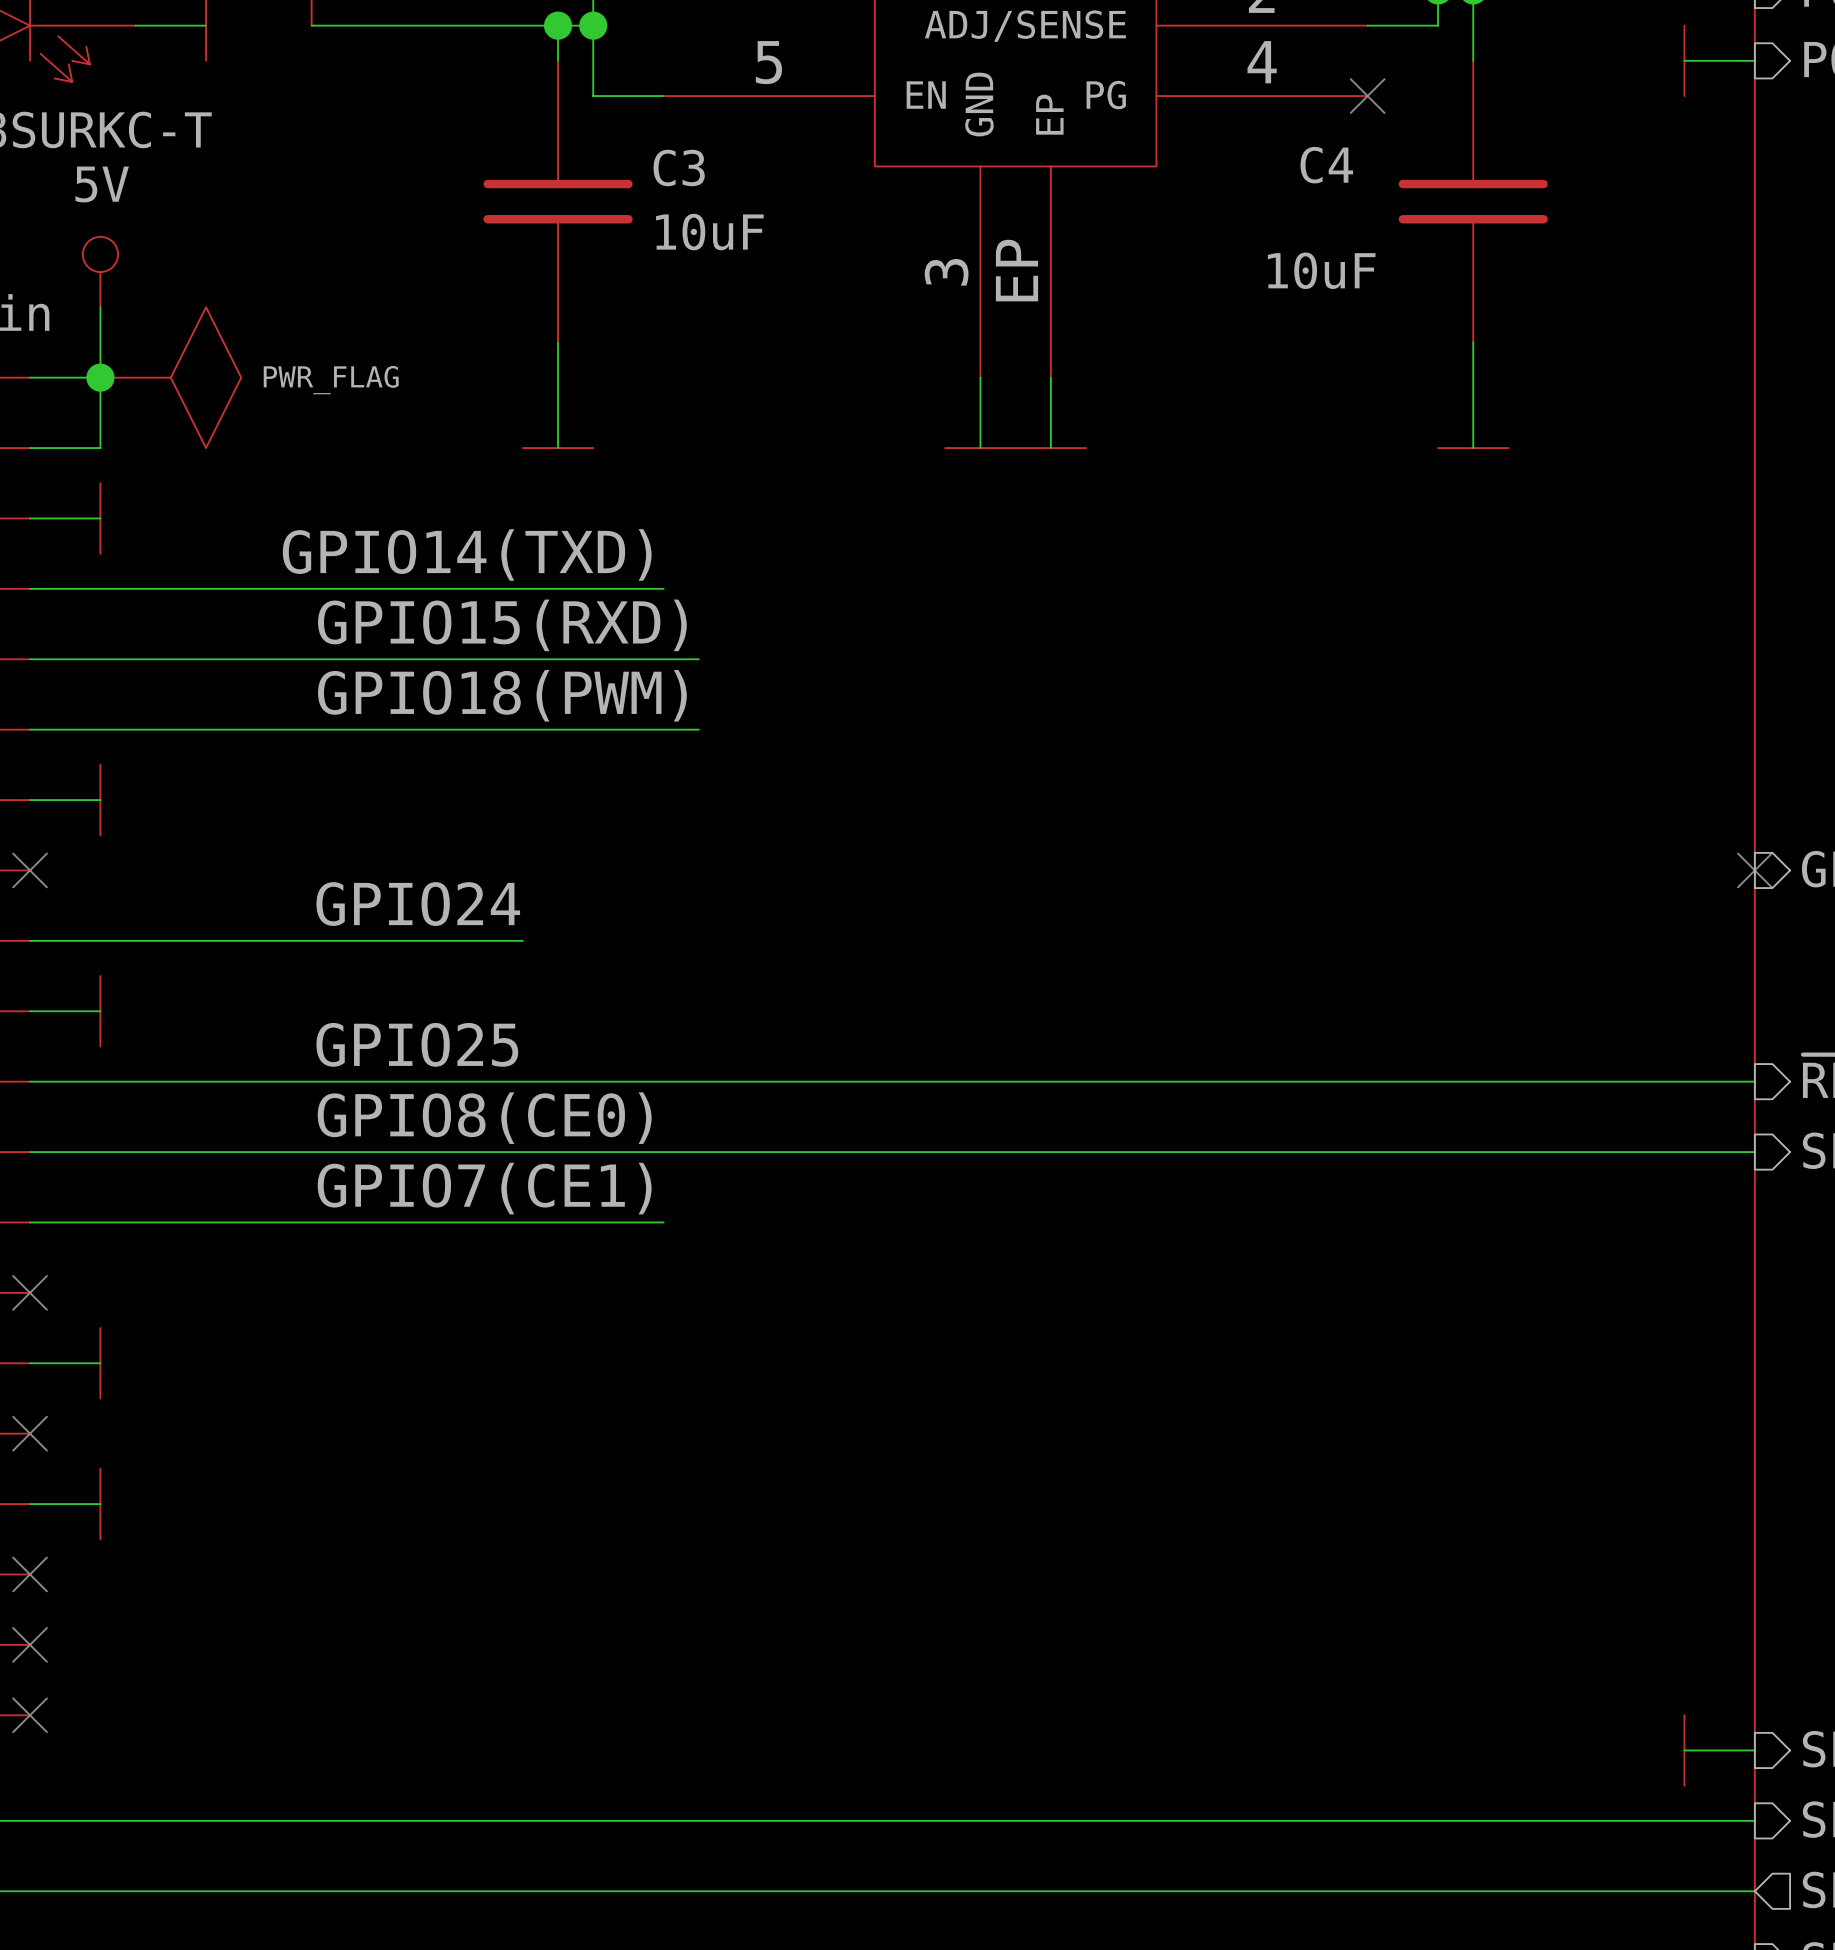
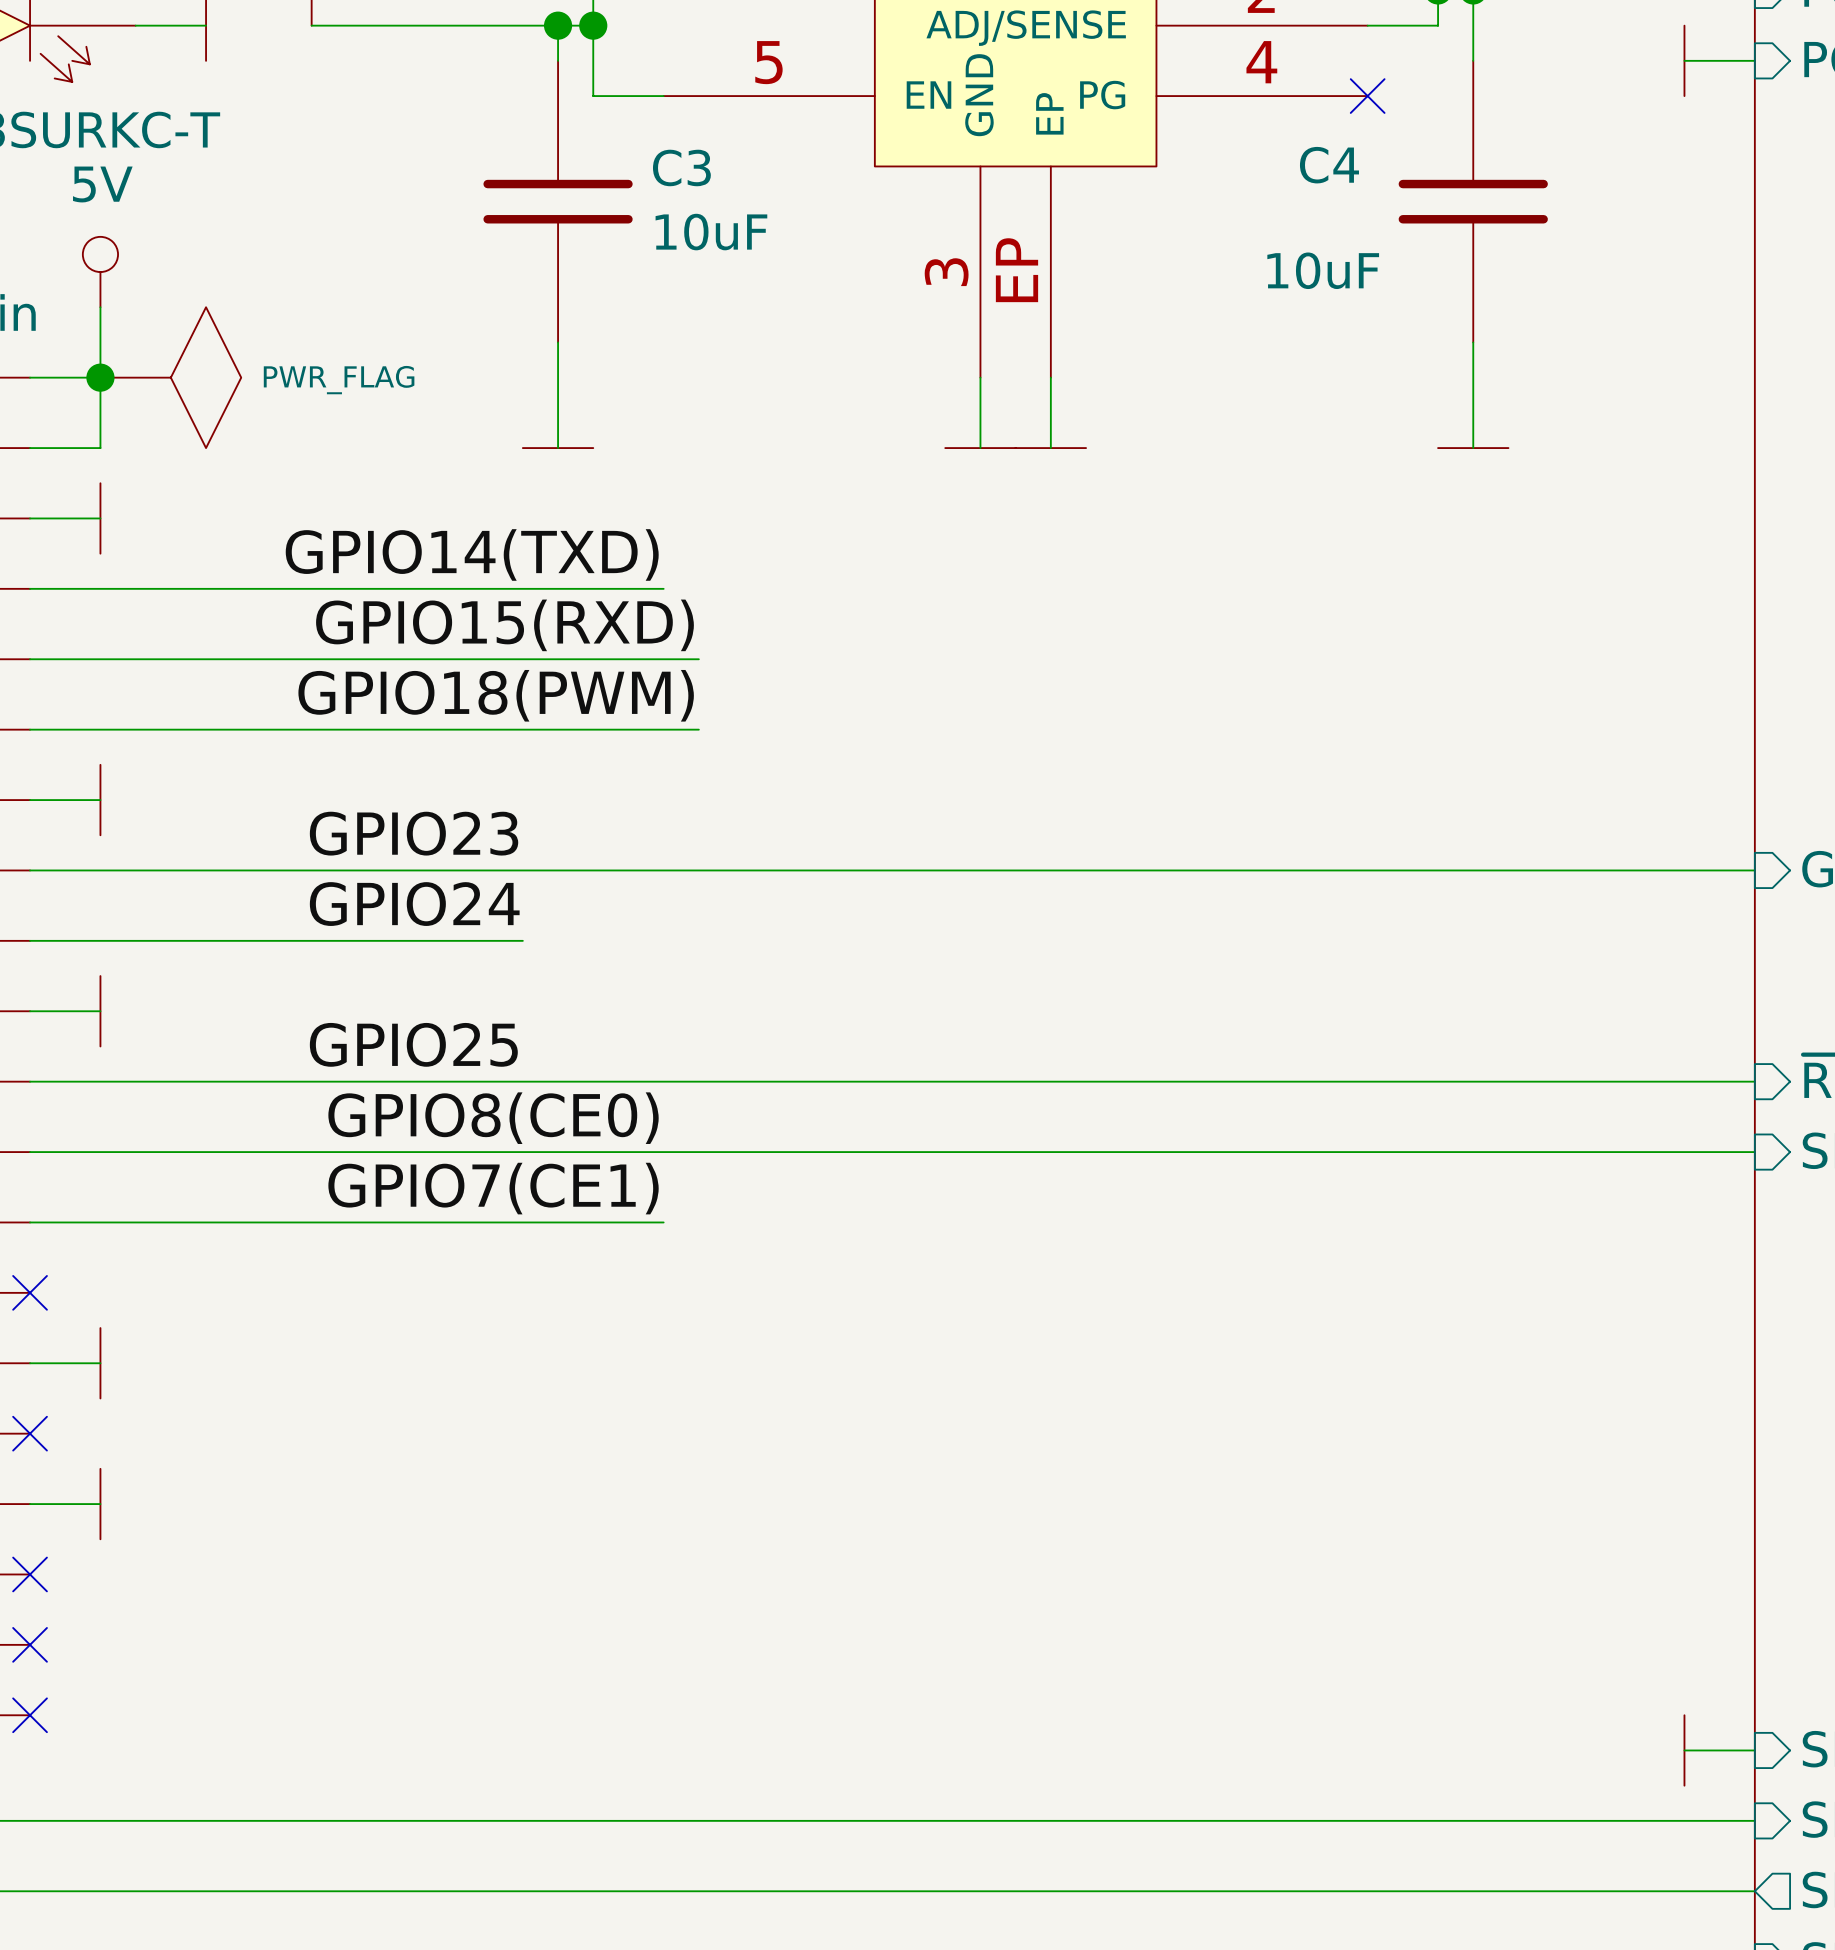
label: none -> GPIO23 (414, 833)
wire: none -> (30, 870) (1754, 870)
no-connect mark: (30, 870) -> none
no-connect mark: (1754, 870) -> none

